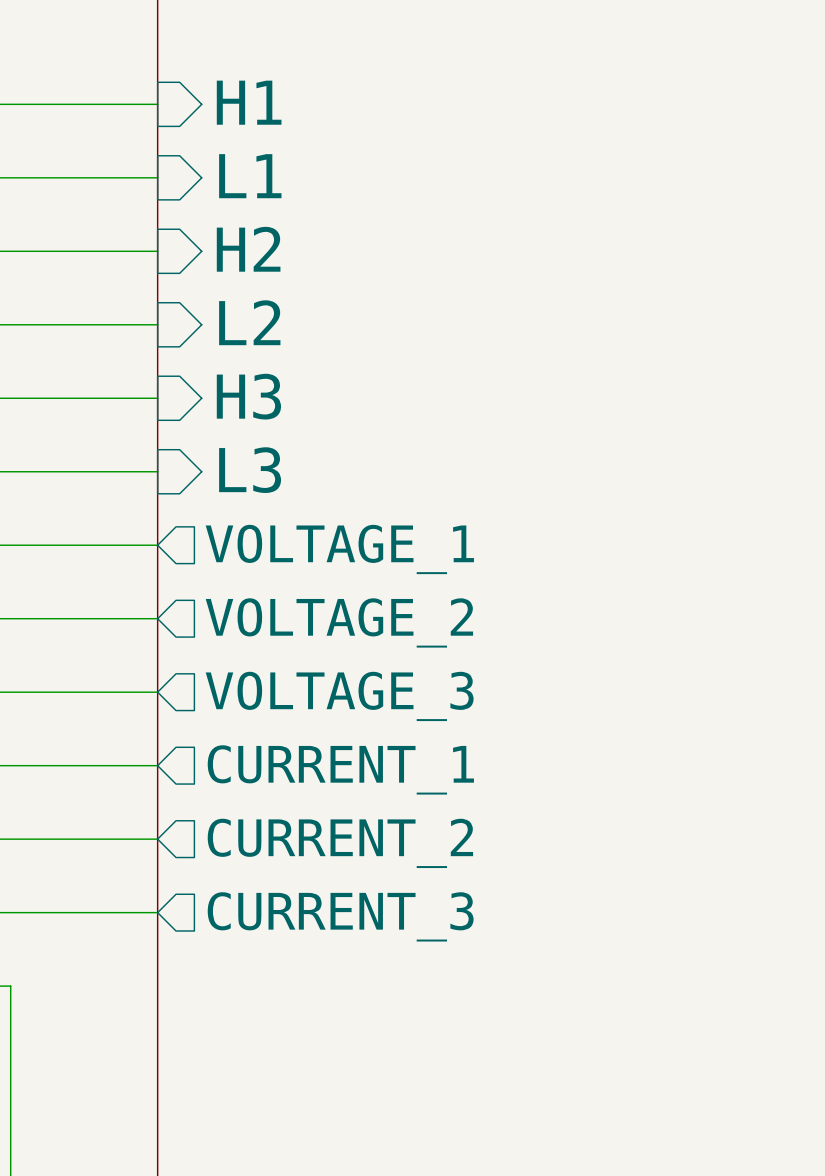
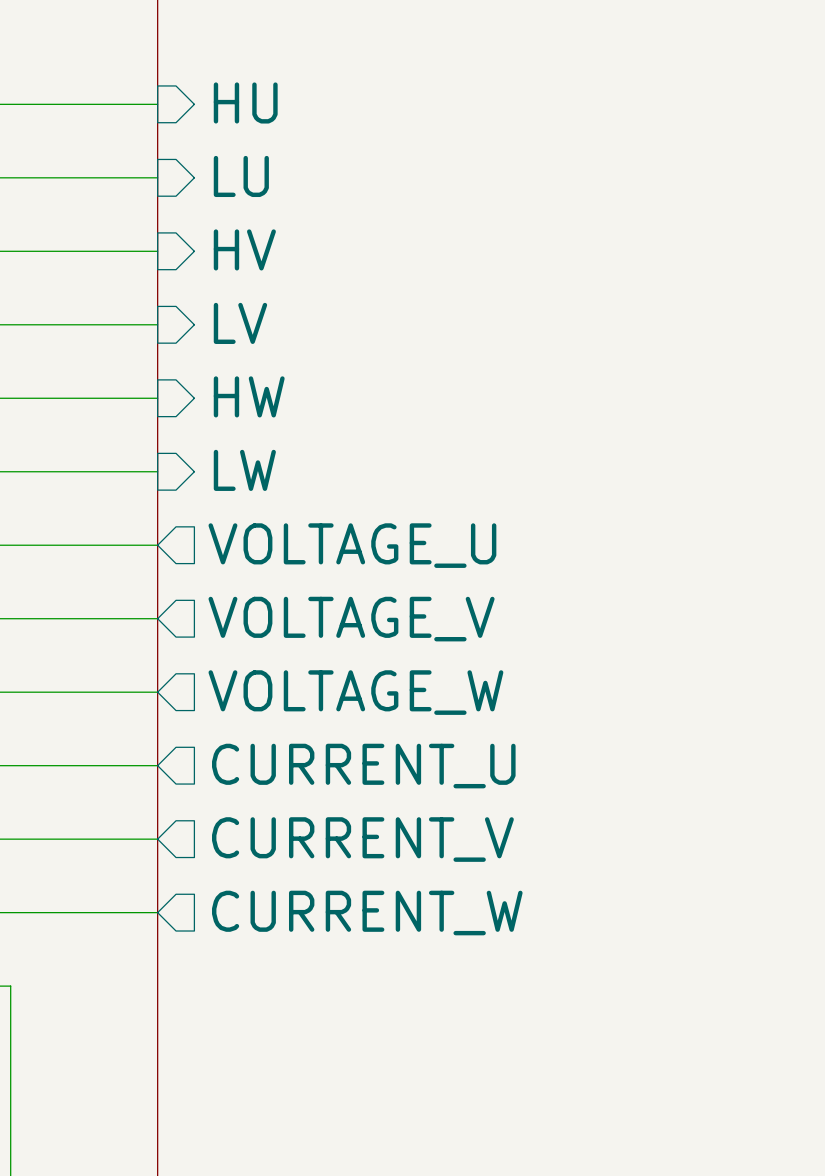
sheet pin: H1 (249, 102) -> HU (245, 102)
sheet pin: L1 (250, 176) -> LU (241, 176)
sheet pin: H2 (248, 249) -> HV (244, 249)
sheet pin: L2 (249, 322) -> LV (240, 323)
sheet pin: H3 (248, 396) -> HW (249, 396)
sheet pin: L3 (250, 470) -> LW (244, 470)
sheet pin: VOLTAGE_1 (339, 549) -> VOLTAGE_U (352, 545)
sheet pin: VOLTAGE_2 (339, 622) -> VOLTAGE_V (351, 619)
sheet pin: VOLTAGE_3 (339, 696) -> VOLTAGE_W (355, 692)
sheet pin: CURRENT_1 (340, 769) -> CURRENT_U (363, 766)
sheet pin: CURRENT_2 (340, 843) -> CURRENT_V (362, 839)
sheet pin: CURRENT_3 (340, 916) -> CURRENT_W (367, 913)

